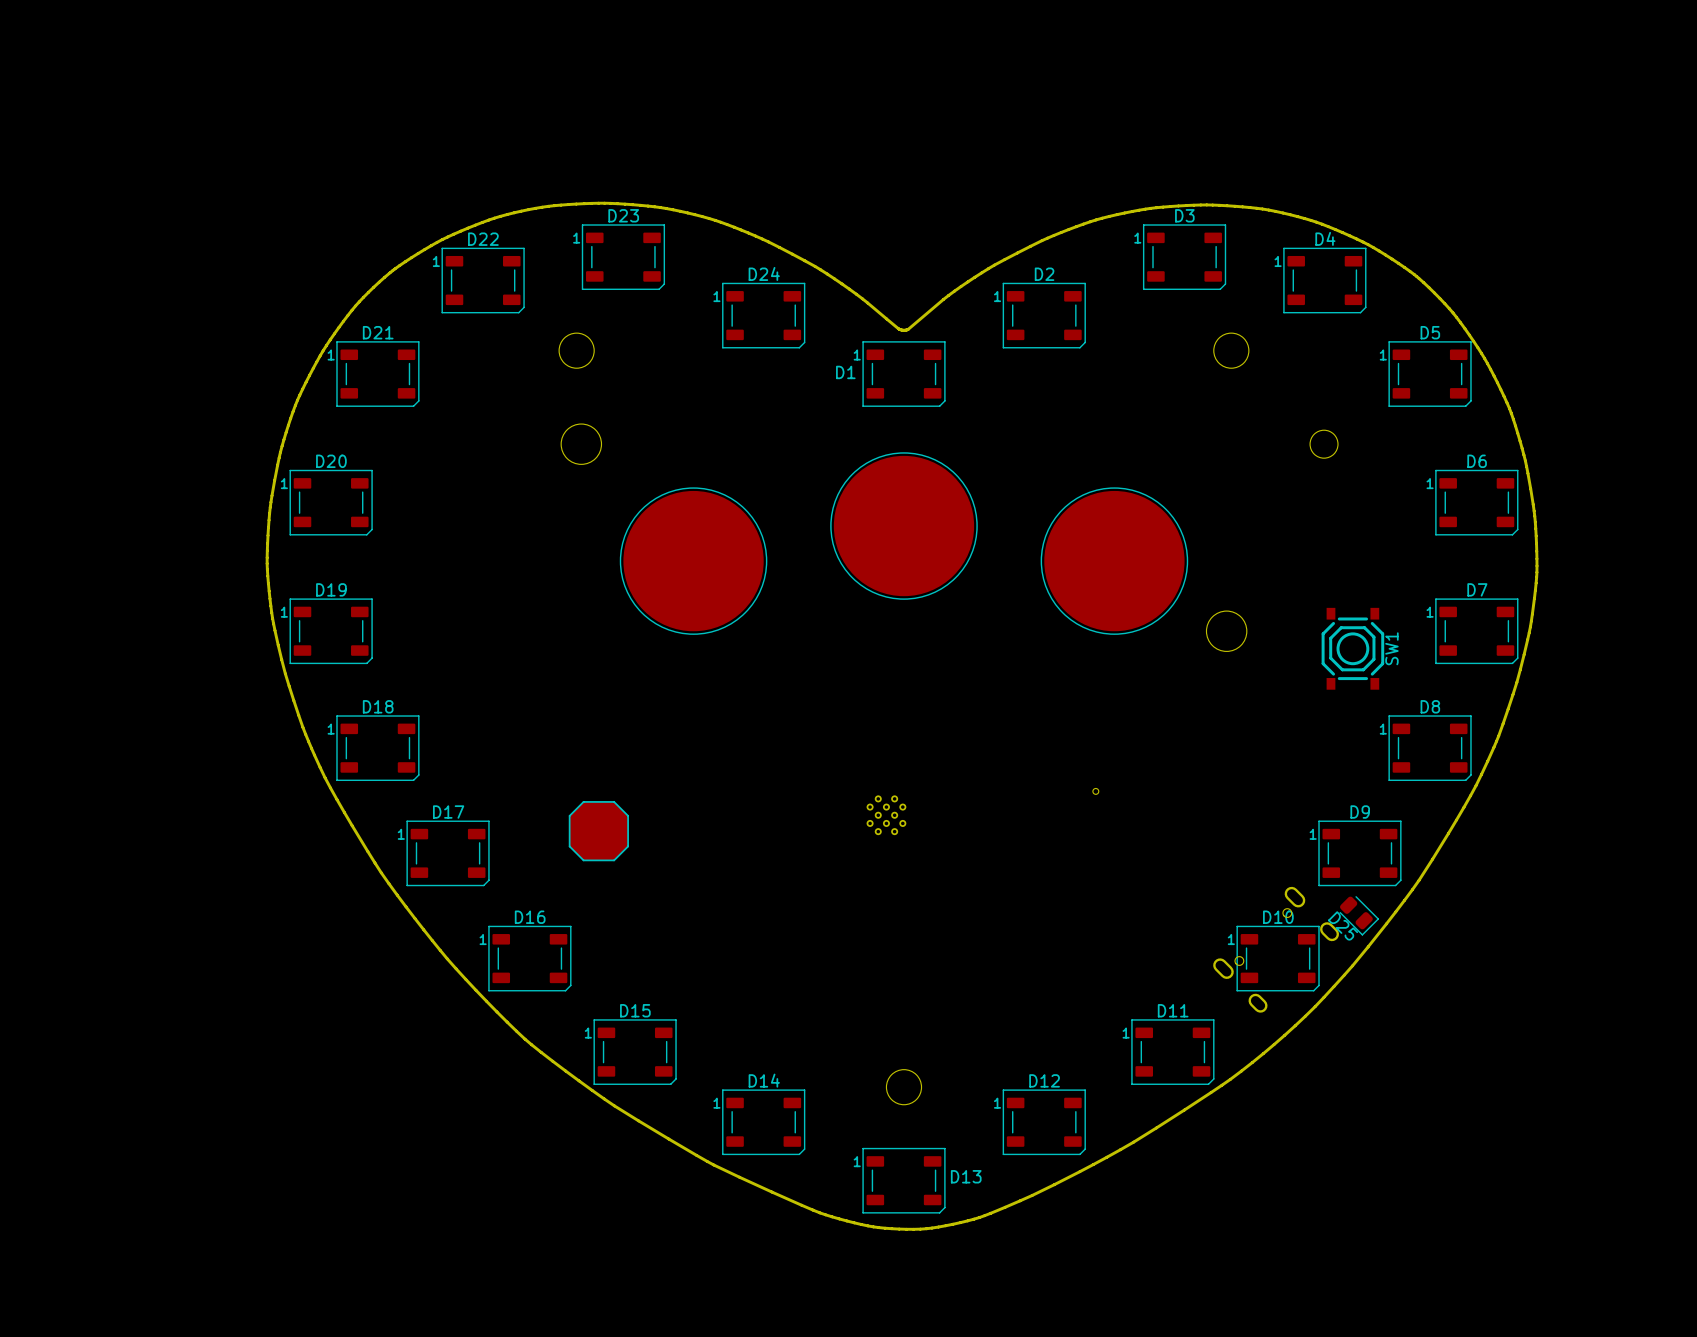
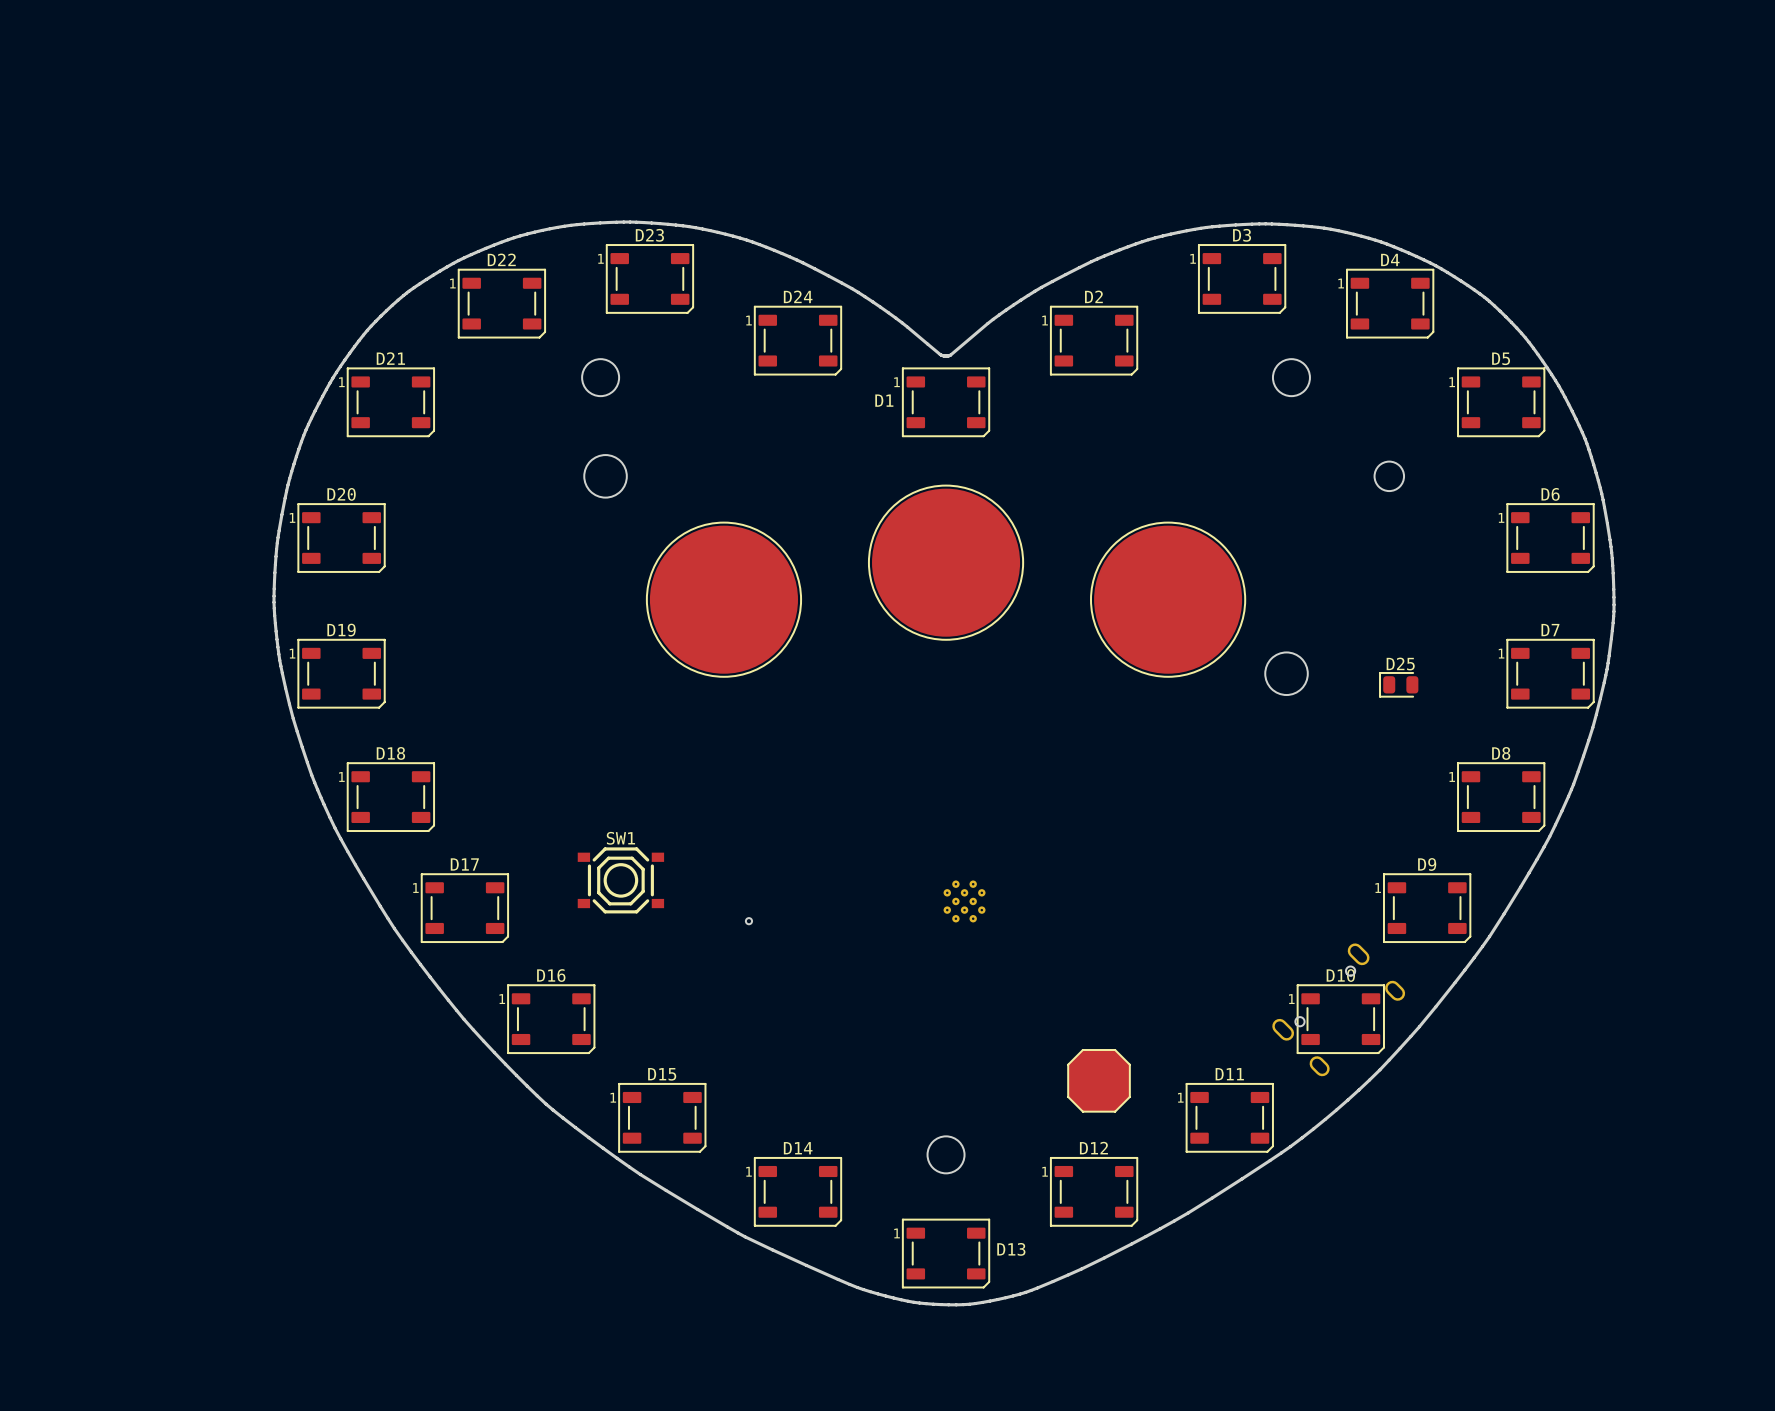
SW1 rotation: 0° (1352, 648) -> 90° counterclockwise (620, 880)
SW1 position: (1352, 648) -> (620, 880)
part: (1095, 791) -> none
part: (886, 815) -> none
part: (598, 831) -> none
part: none -> (964, 901)
part: none -> (748, 921)
D25 rotation: 0° (1359, 915) -> 135° clockwise (1398, 684)
D25 position: (1359, 915) -> (1398, 684)
part: none -> (1099, 1080)

